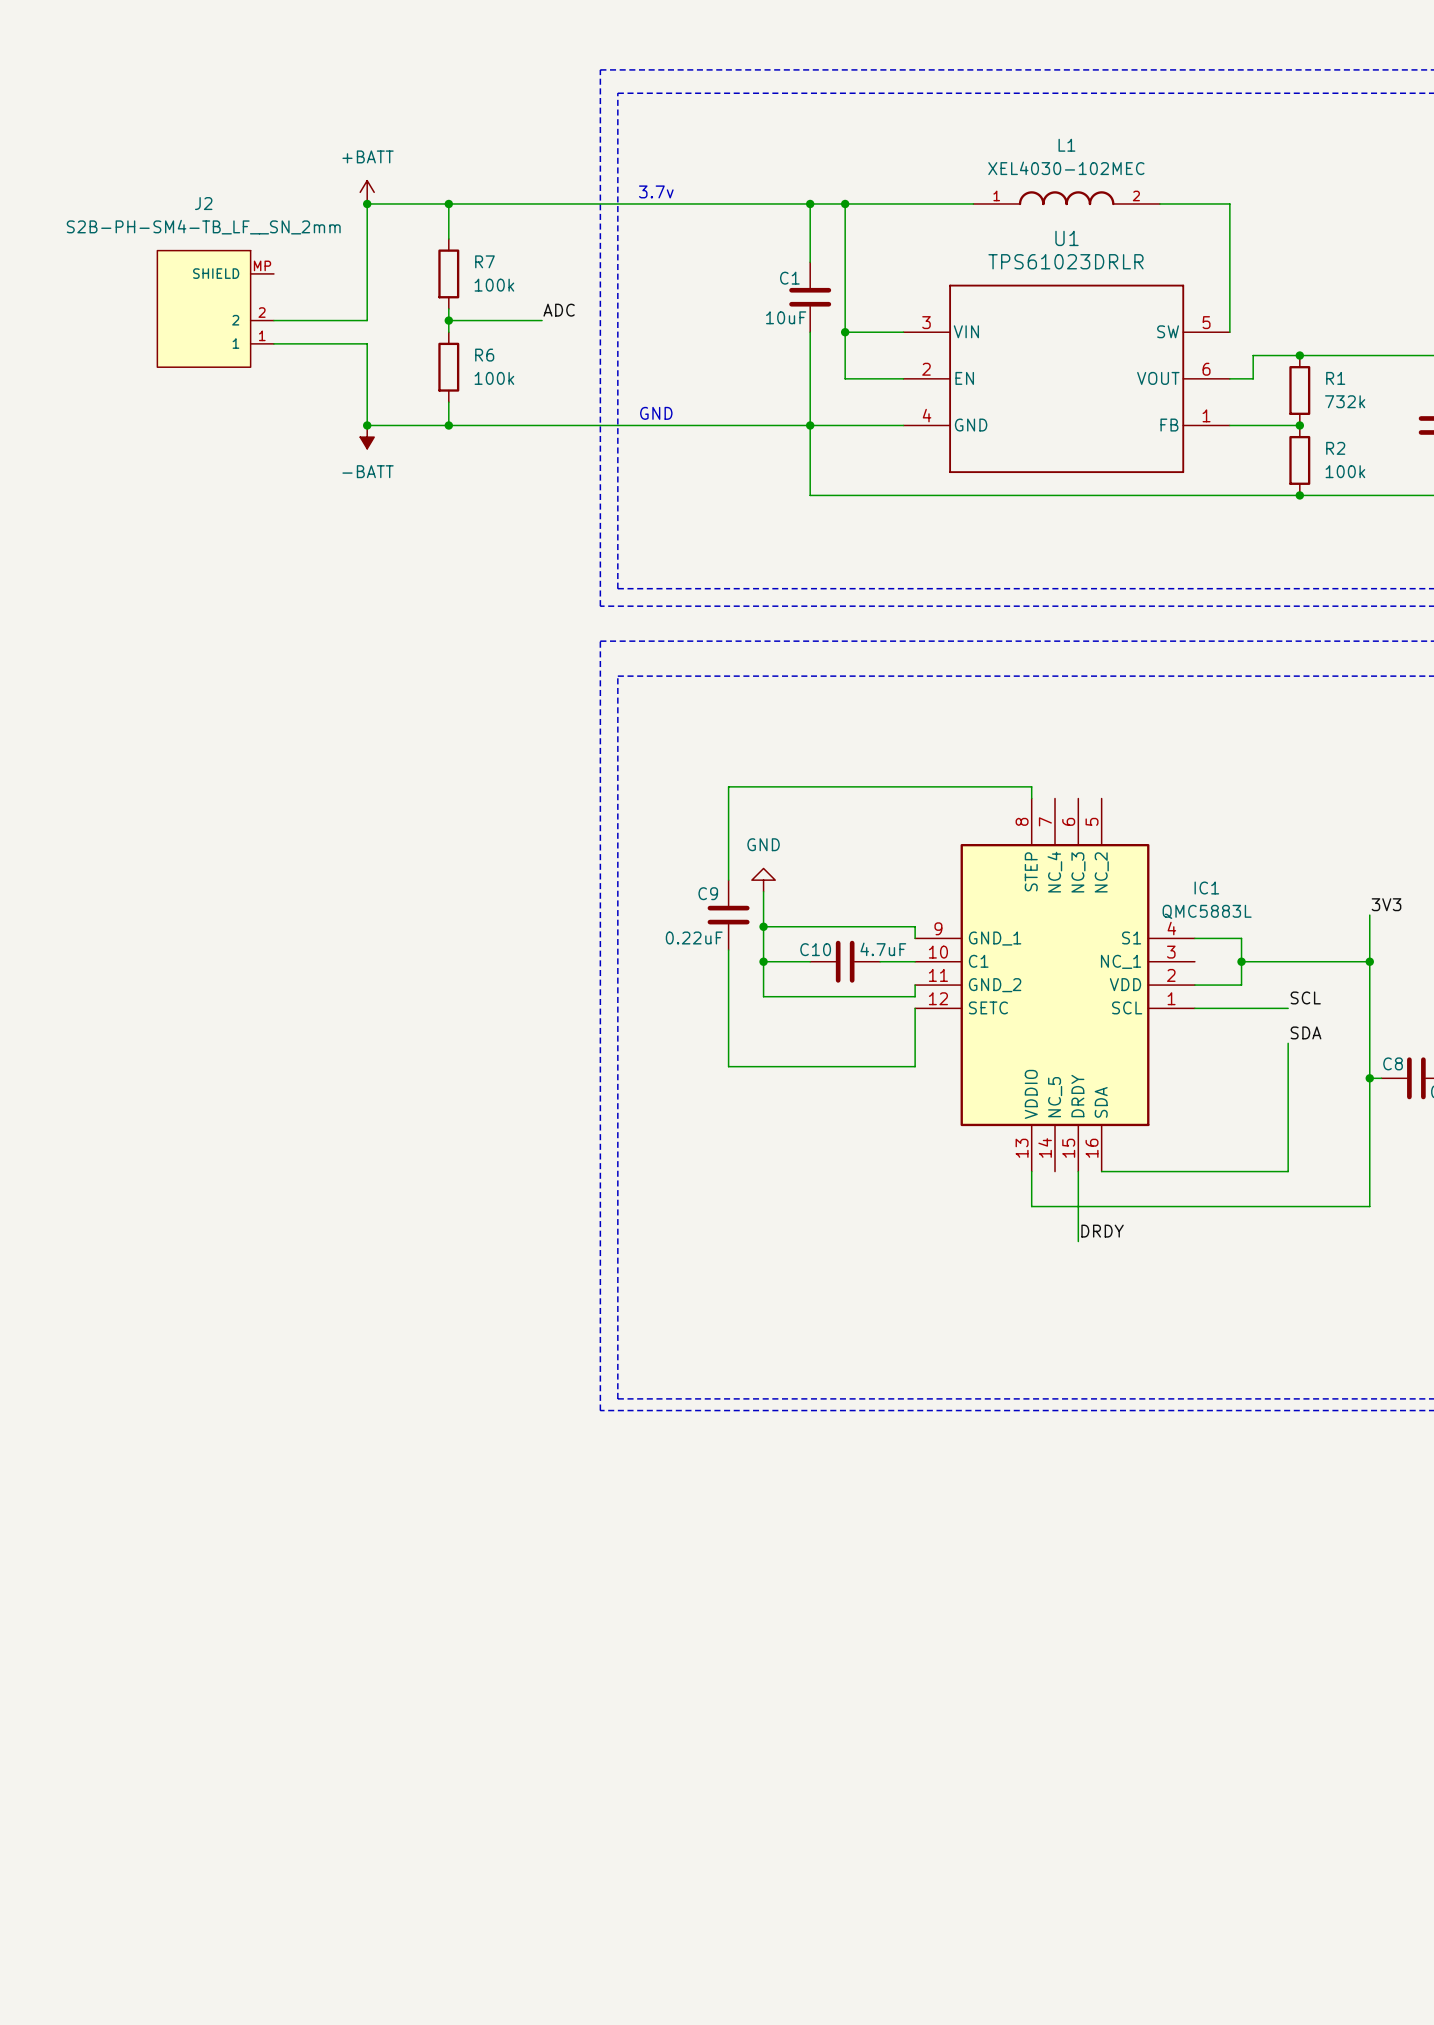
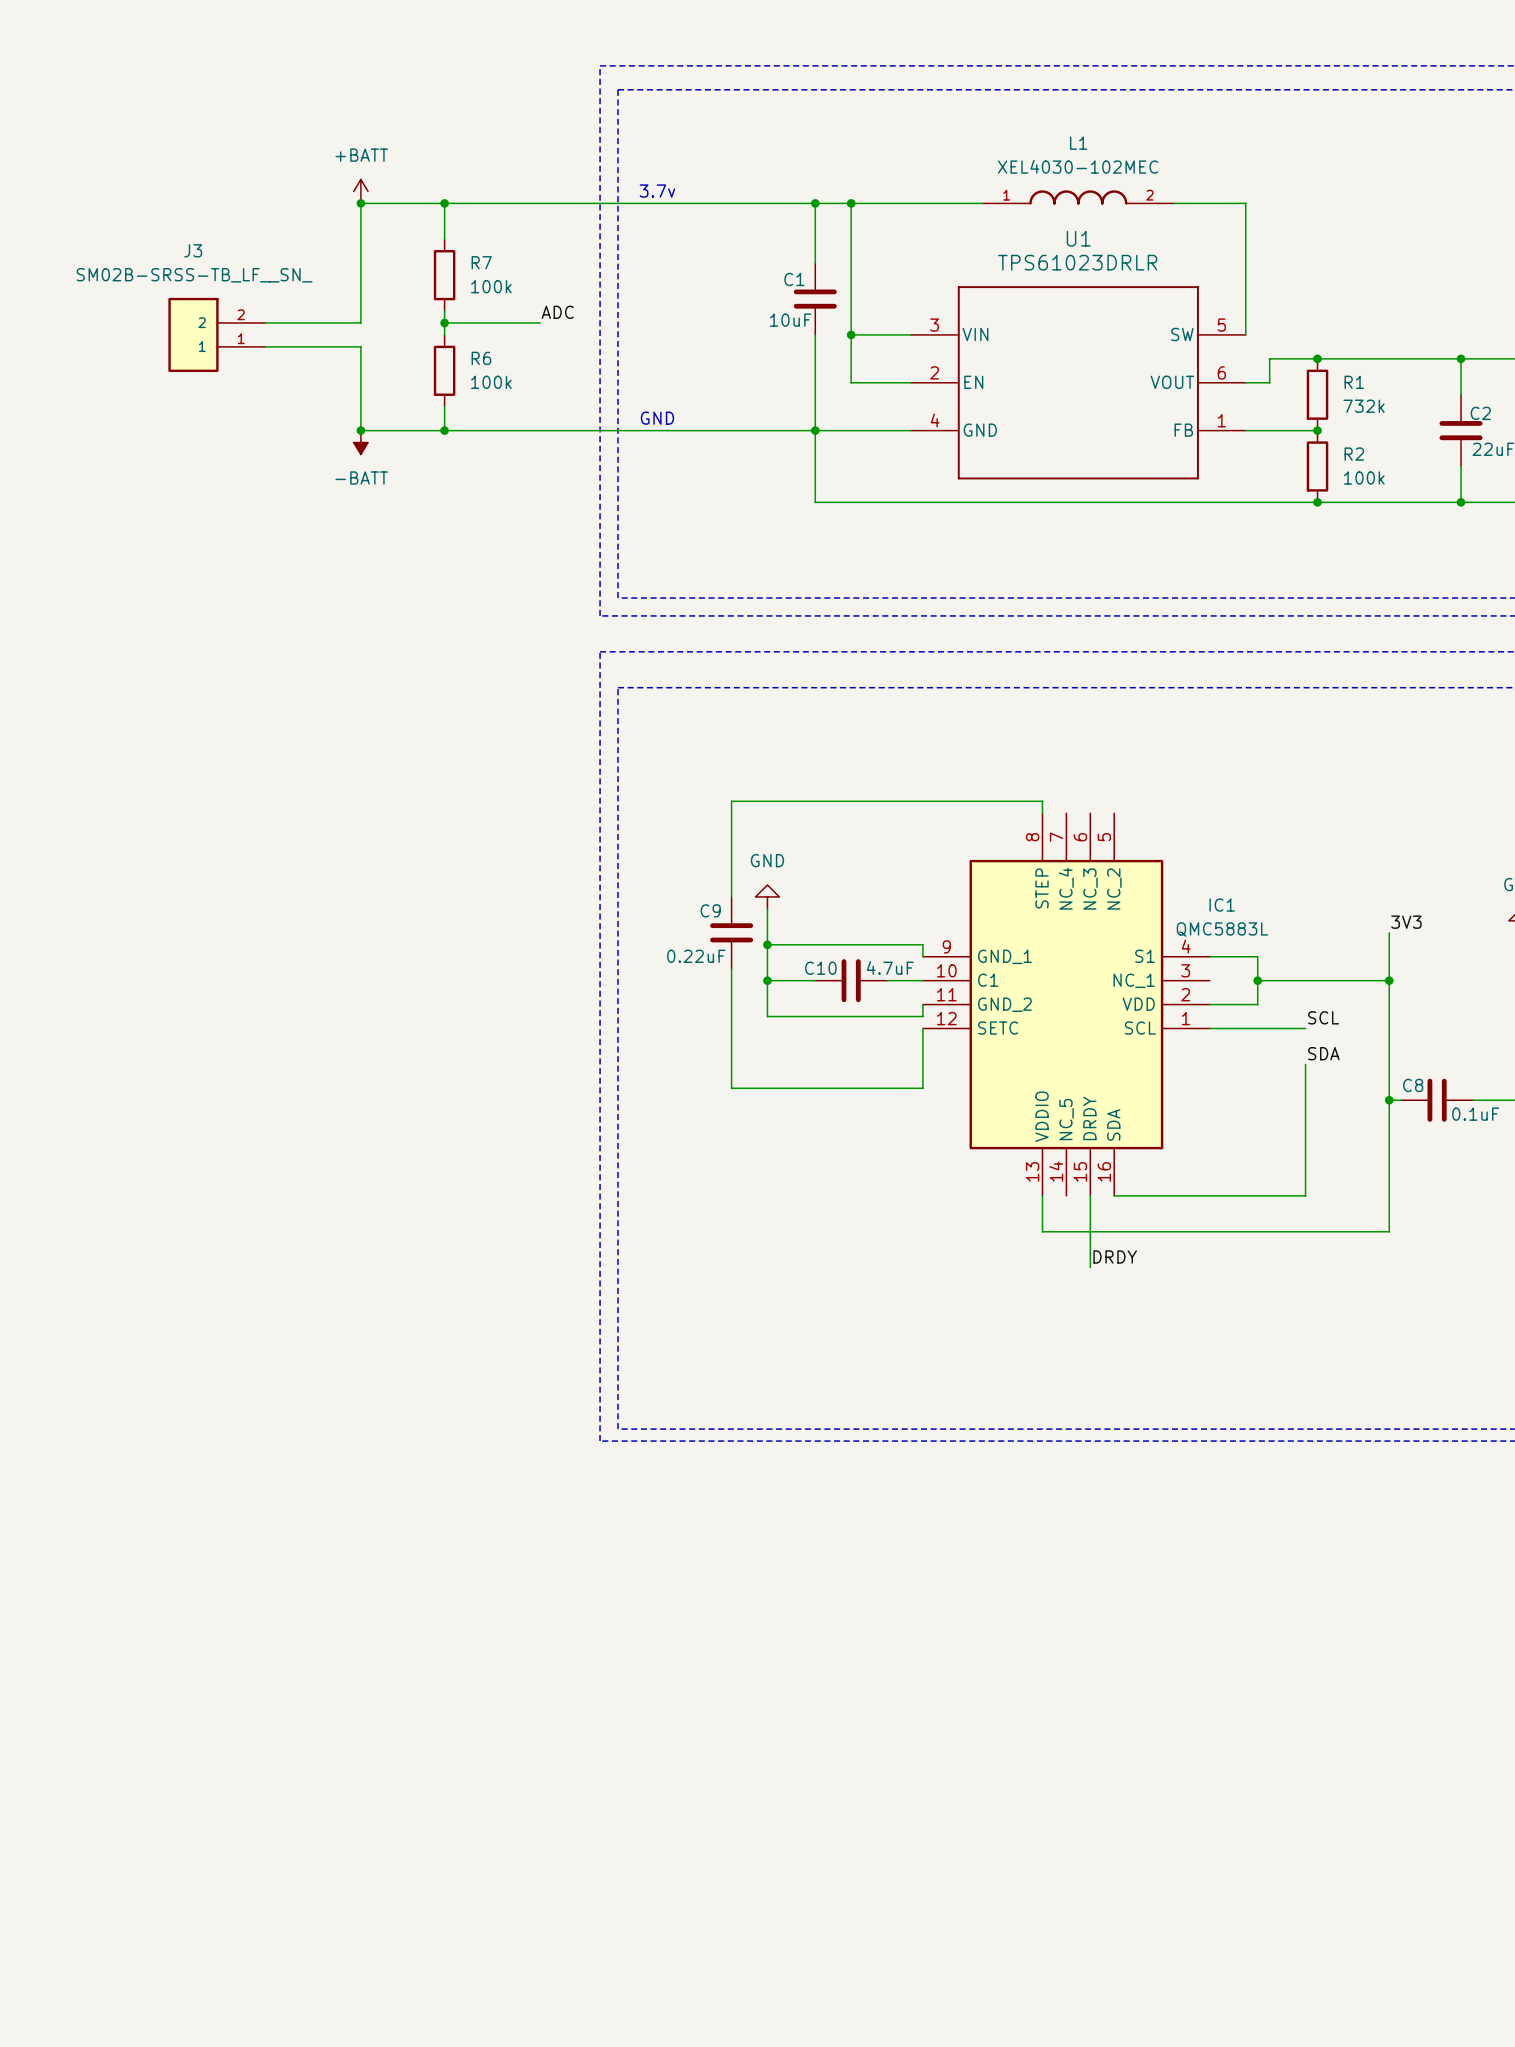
J2: S2B-PH-SM4-TB_LF__SN_2mm (215, 308) -> none
J3: none -> SM02B-SRSS-TB_LF__SN_ (216, 334)

